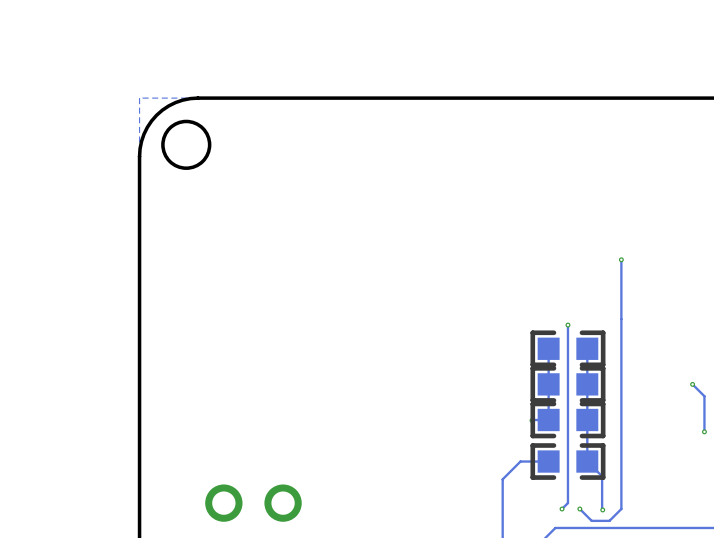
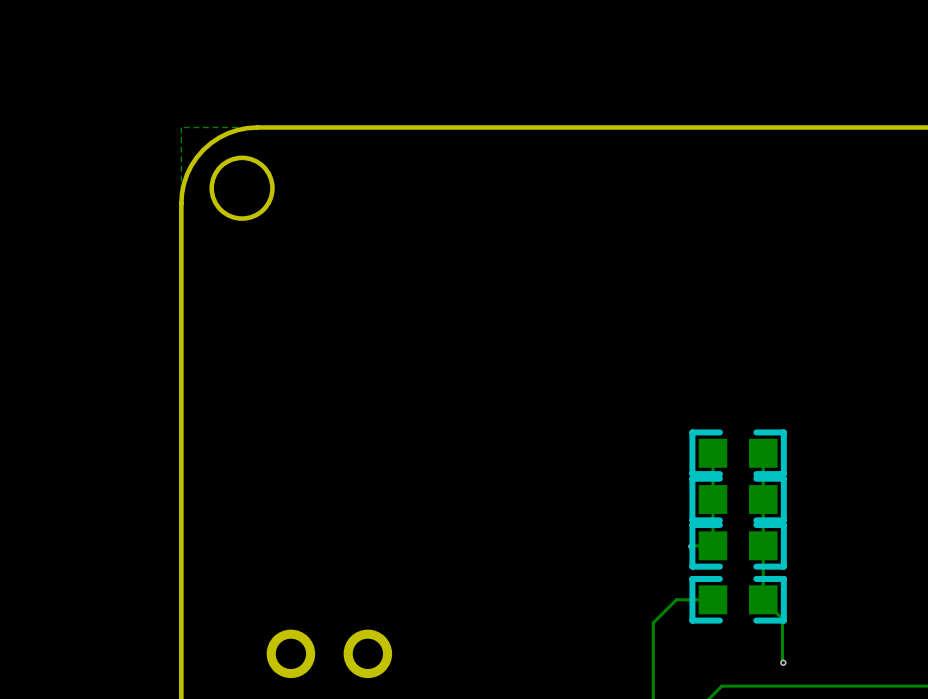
track: (621, 259) (621, 509) (609, 520) (591, 520) (579, 509) -> none
via: (621, 259) -> none
track: (567, 325) (567, 503) (562, 509) -> none
via: (567, 325) -> none
track: (692, 384) (704, 396) (704, 431) -> none
via: (692, 384) -> none
via: (704, 431) -> none
via: (562, 509) -> none
via: (579, 509) -> none

